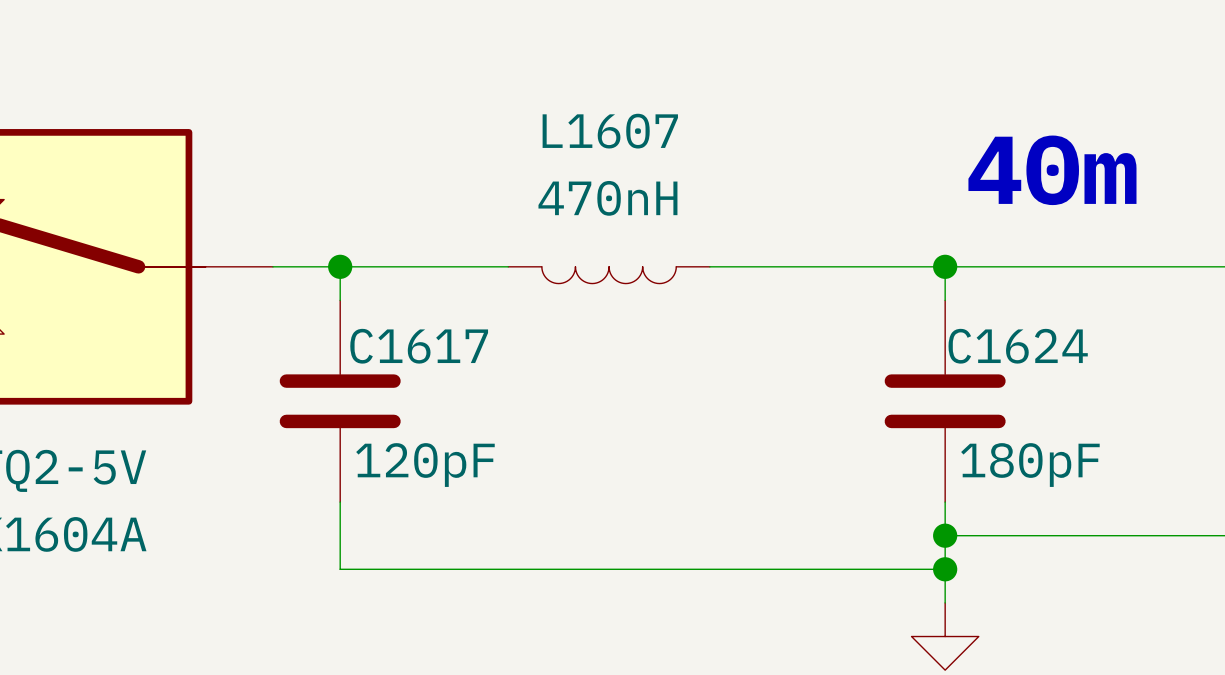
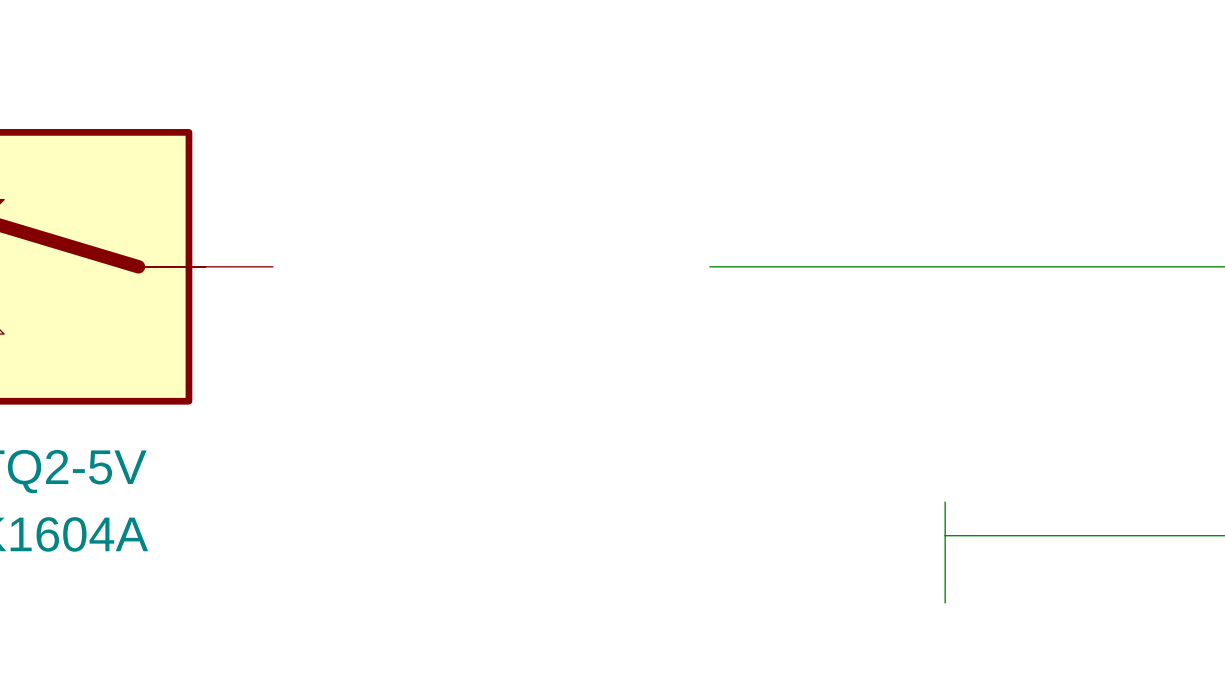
text: 40m (1052, 170) -> none
wire: (272, 266) (508, 266) -> none
wire: (340, 266) (340, 300) -> none
junction: (340, 266) -> none
wire: (945, 266) (945, 300) -> none
junction: (945, 266) -> none
L1607: 470nH (609, 275) -> none
C1617: 120pF (340, 401) -> none
C1624: 180pF (945, 401) -> none
wire: (340, 502) (340, 569) (945, 569) -> none
junction: (945, 535) -> none
junction: (945, 569) -> none
power symbol: (945, 636) -> none

